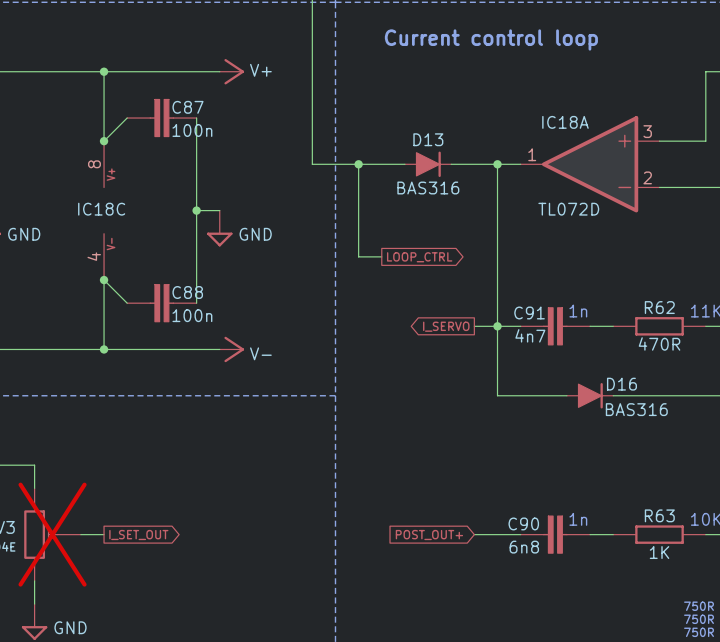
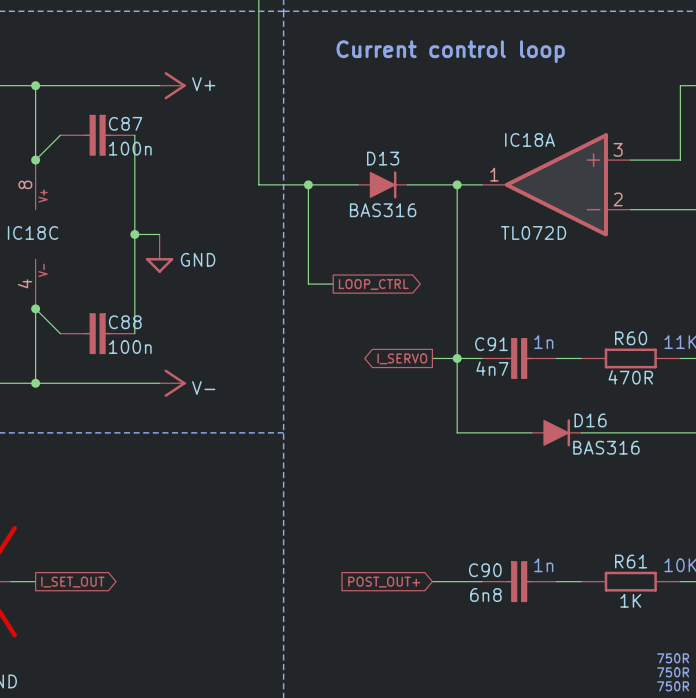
R62 name: R62 (659, 307) -> R60 (631, 338)
R63 name: R63 (659, 515) -> R61 (631, 561)

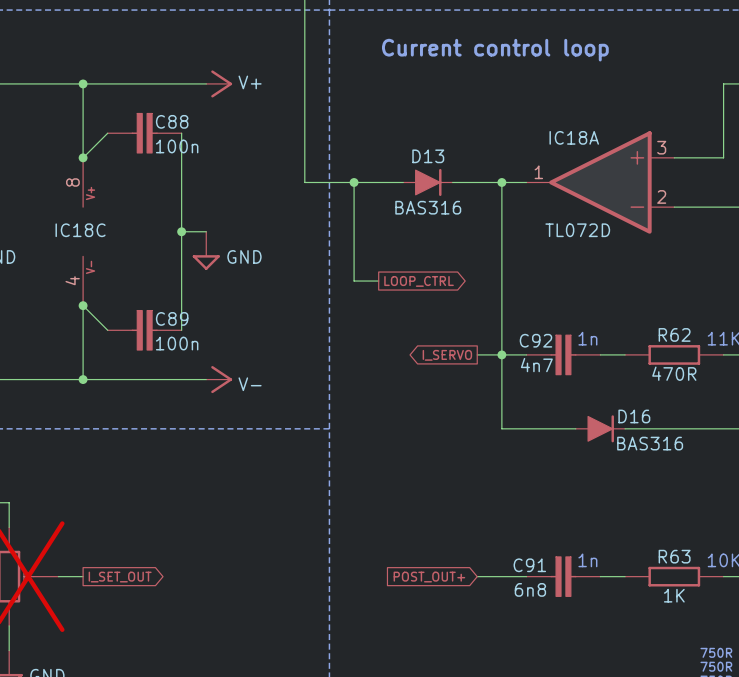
C87 name: C87 (125, 123) -> C88 (172, 121)
C88 name: C88 (125, 322) -> C89 (172, 318)
R60 name: R60 (631, 338) -> R62 (674, 334)
C91 name: C91 (491, 344) -> C92 (535, 340)
R61 name: R61 (631, 561) -> R63 (674, 556)
C90 name: C90 (485, 570) -> C91 (529, 565)

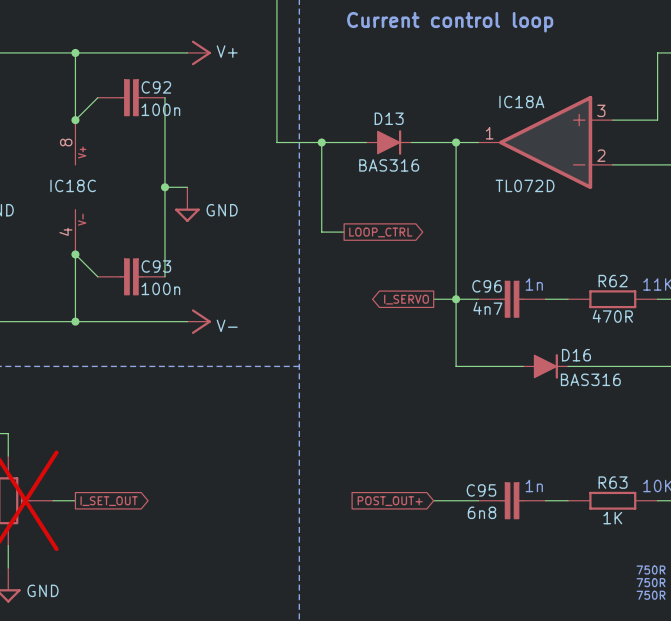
C88 name: C88 (172, 121) -> C92 (156, 87)
C89 name: C89 (172, 318) -> C93 (156, 266)
C92 name: C92 (535, 340) -> C96 (487, 286)
C91 name: C91 (529, 565) -> C95 (481, 490)

